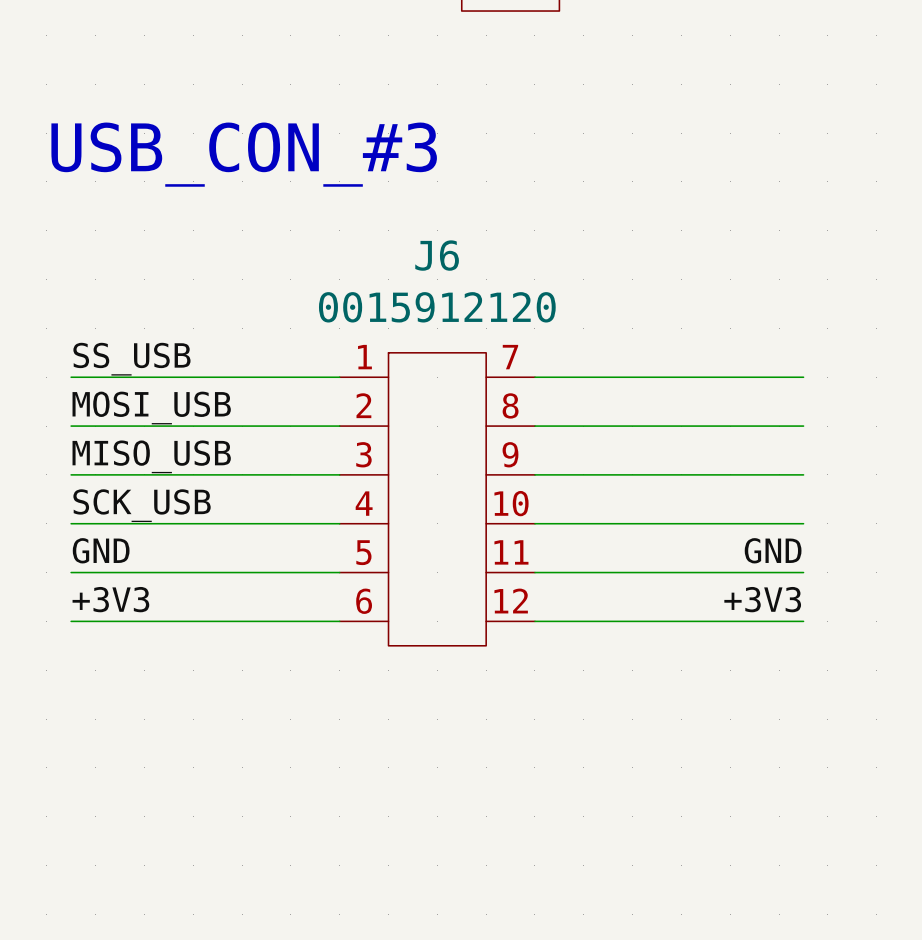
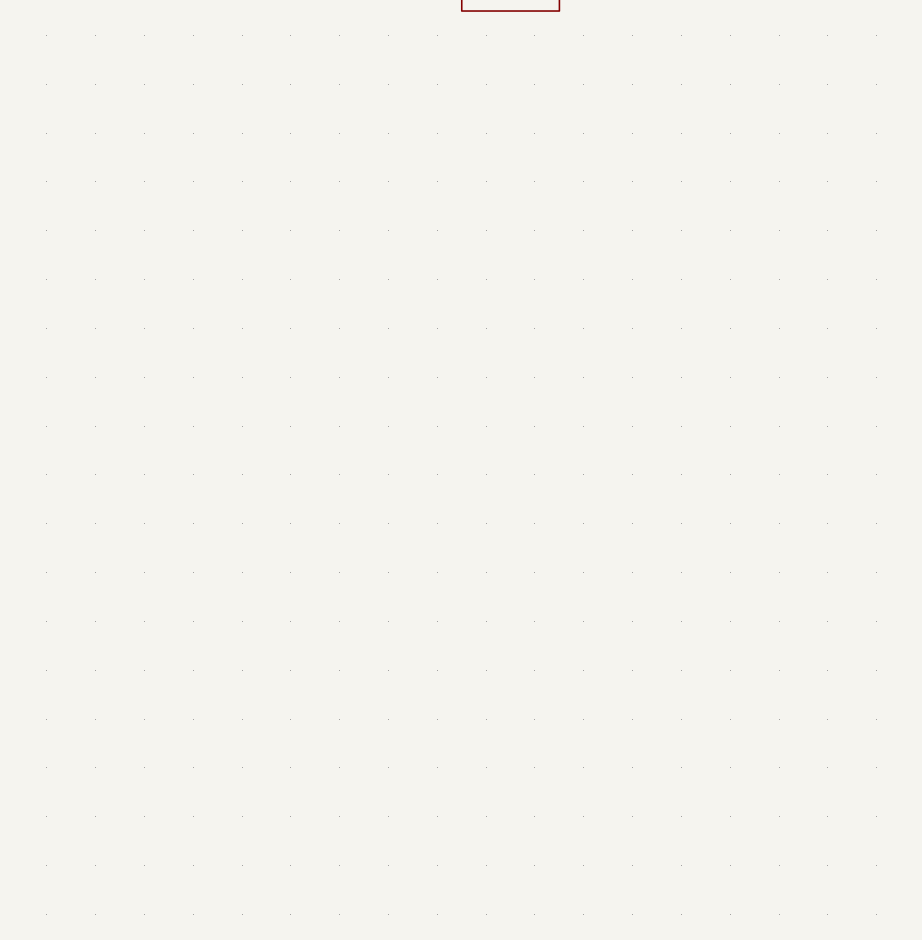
text: USB_CON_#3 (244, 154) -> none
label: SS_USB (131, 359) -> none
wire: (71, 377) (339, 377) -> none
wire: (534, 377) (803, 377) -> none
label: MOSI_USB (151, 408) -> none
wire: (71, 426) (339, 426) -> none
wire: (534, 426) (803, 426) -> none
label: MISO_USB (151, 456) -> none
wire: (71, 474) (339, 474) -> none
wire: (534, 474) (803, 474) -> none
J6: 0015912120 (437, 499) -> none
label: SCK_USB (142, 505) -> none
wire: (71, 523) (339, 523) -> none
wire: (534, 523) (803, 523) -> none
label: GND (101, 550) -> none
label: GND (773, 550) -> none
wire: (71, 572) (339, 572) -> none
wire: (534, 572) (803, 572) -> none
label: +3V3 (110, 599) -> none
label: +3V3 (762, 599) -> none
wire: (71, 621) (339, 621) -> none
wire: (534, 621) (803, 621) -> none

